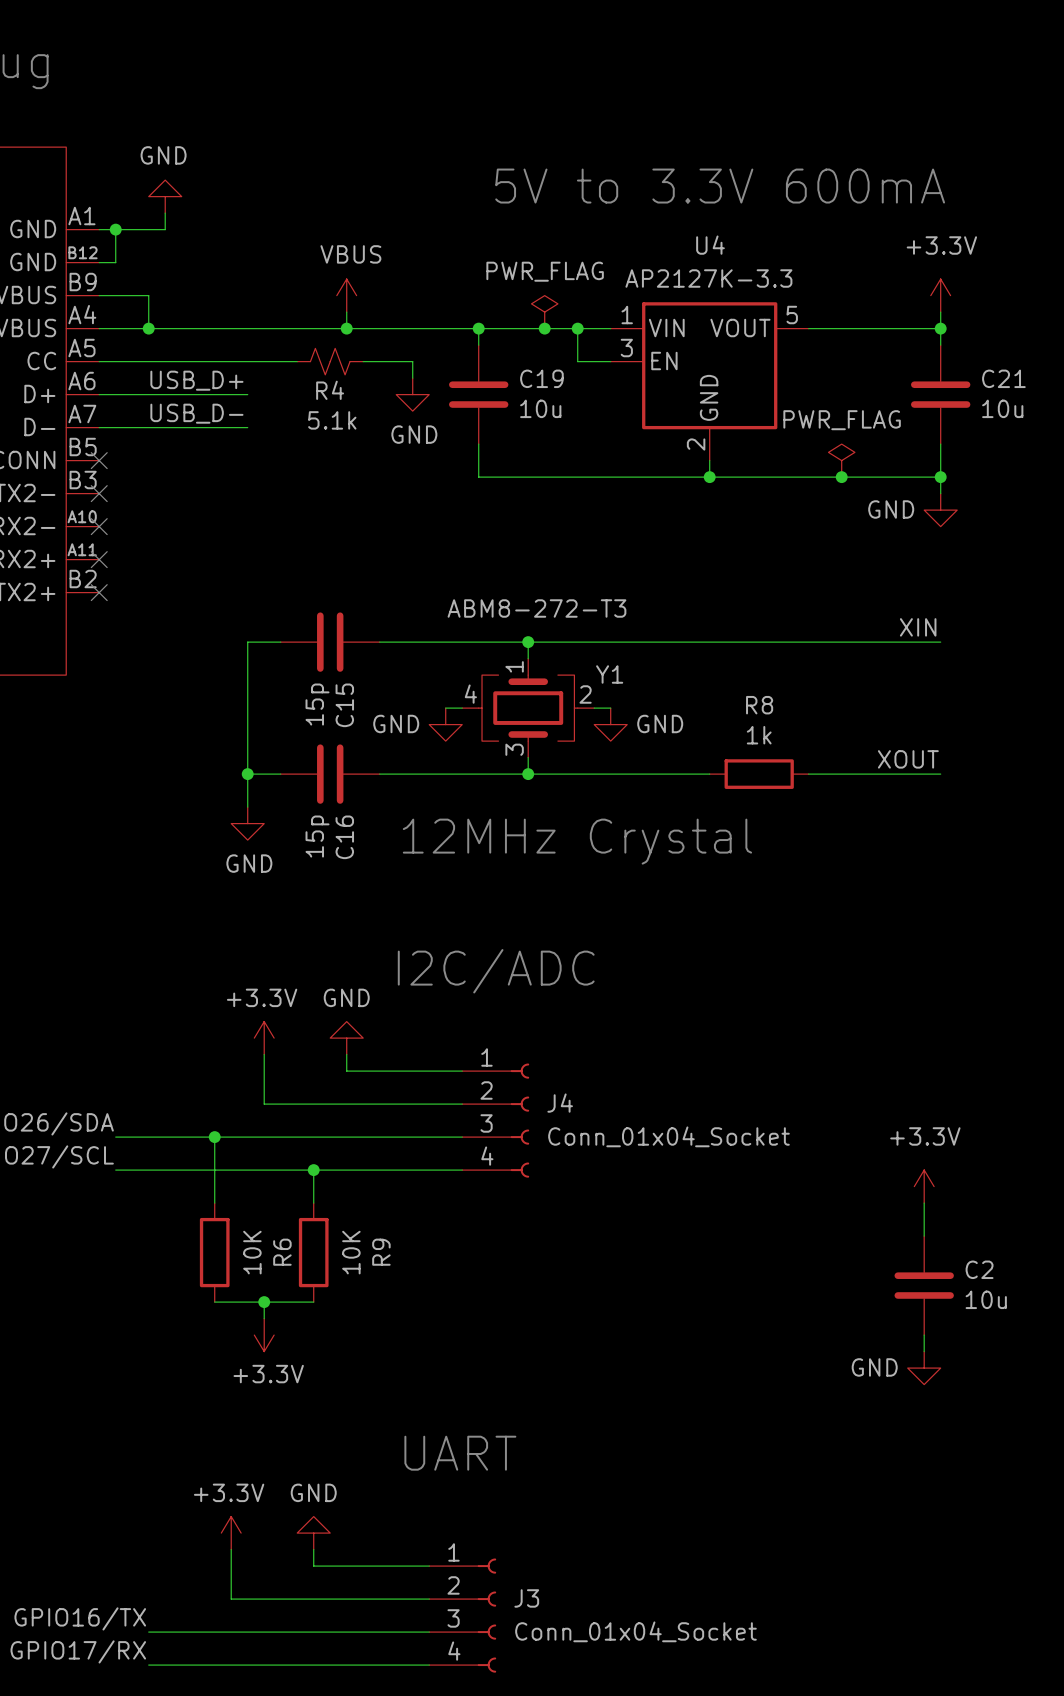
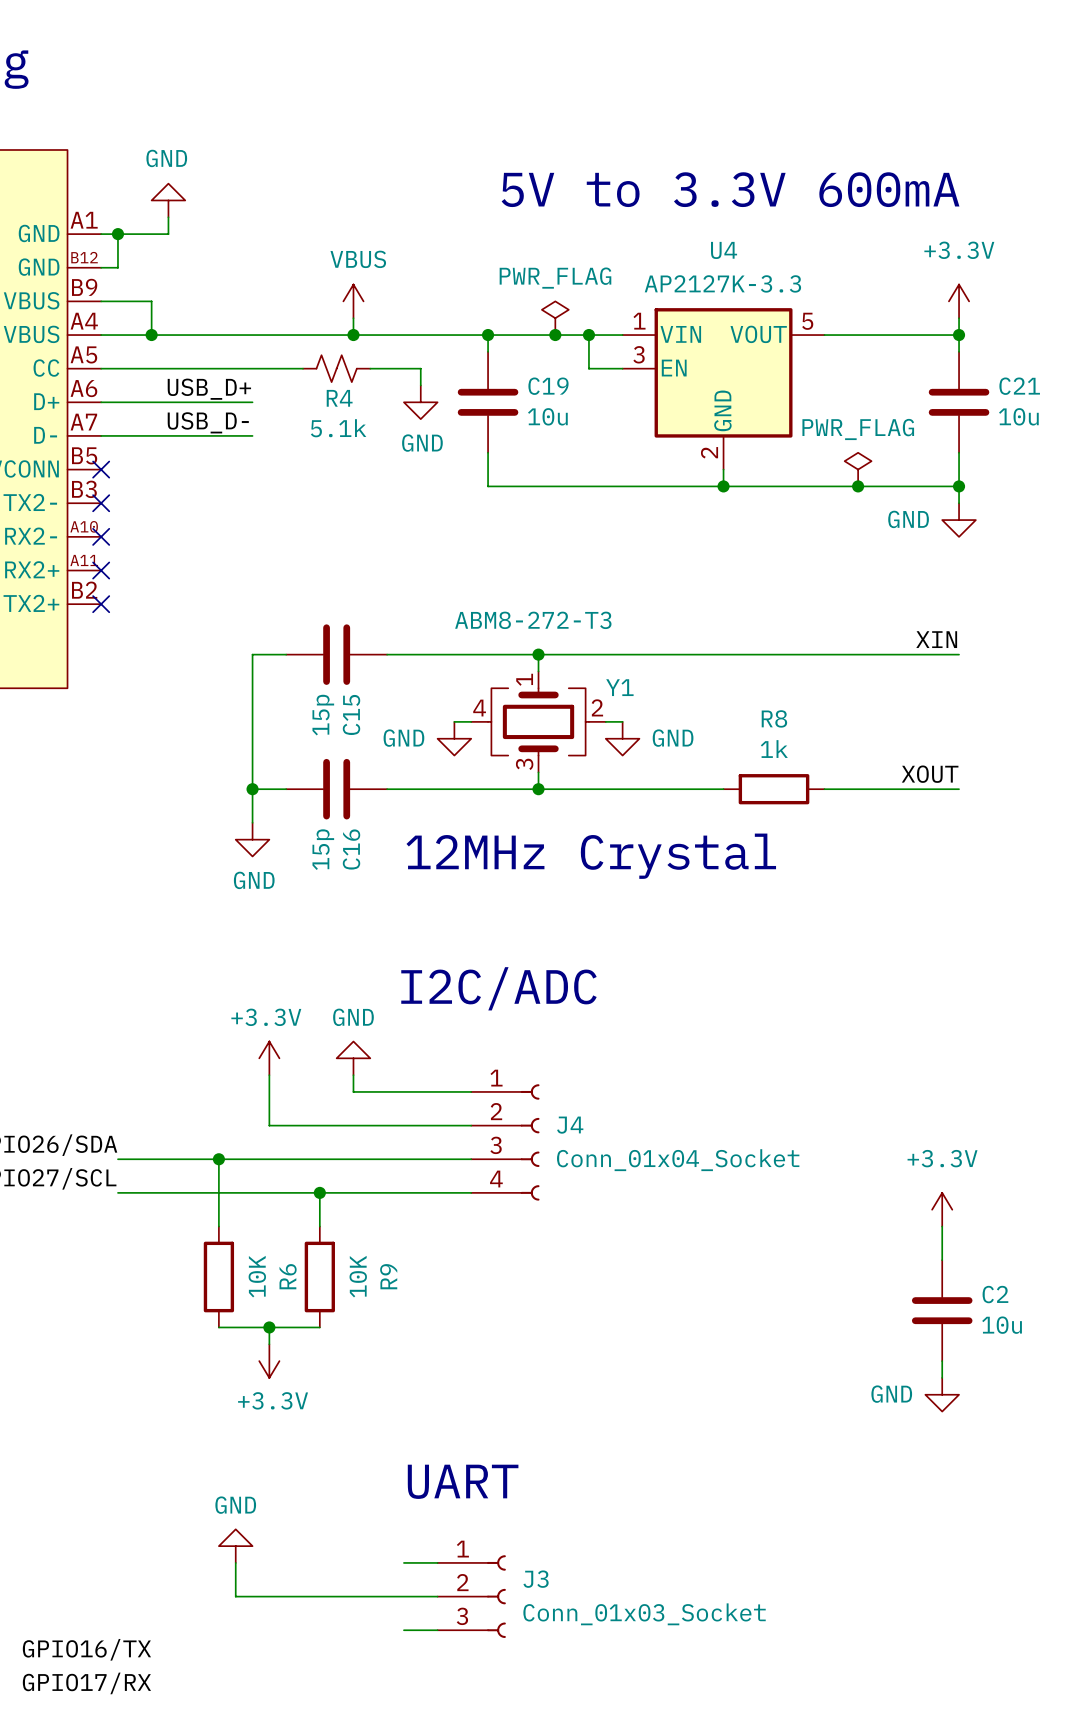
power symbol: +3.3V (231, 1533) -> none
power symbol position: GND (313, 1533) -> GND (235, 1546)
wire: none -> (403, 1562) (437, 1562)
wire: (313, 1549) (313, 1566) -> (235, 1596) (319, 1596)
J3 symbol: [429, 1558, 497, 1673] -> [437, 1555, 506, 1638]
wire: (231, 1566) (231, 1599) (396, 1599) -> none
J3 value: Conn_01x04_Socket (635, 1631) -> Conn_01x03_Socket (644, 1614)
wire: (148, 1632) (429, 1632) -> none
wire: (148, 1665) (429, 1665) -> none

